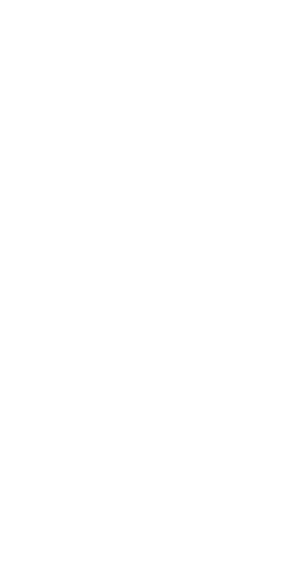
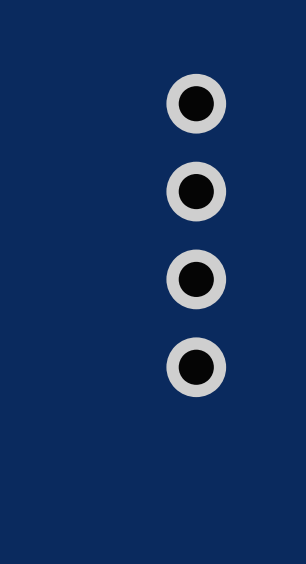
part: none -> (196, 235)

